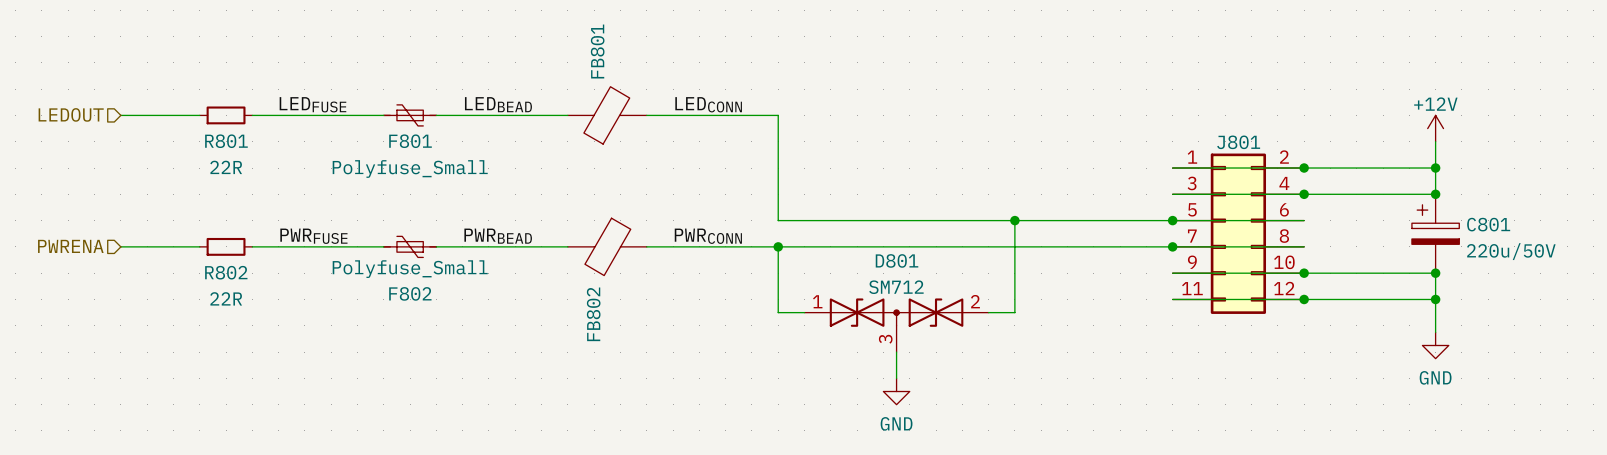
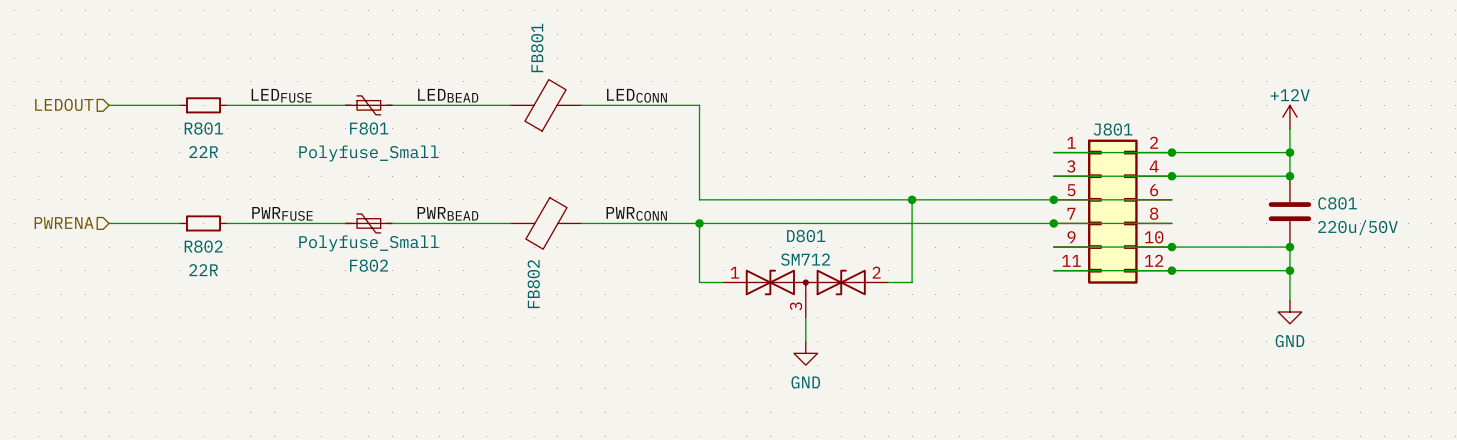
C801 symbol: [1411, 194, 1460, 274] -> [1268, 176, 1312, 248]

